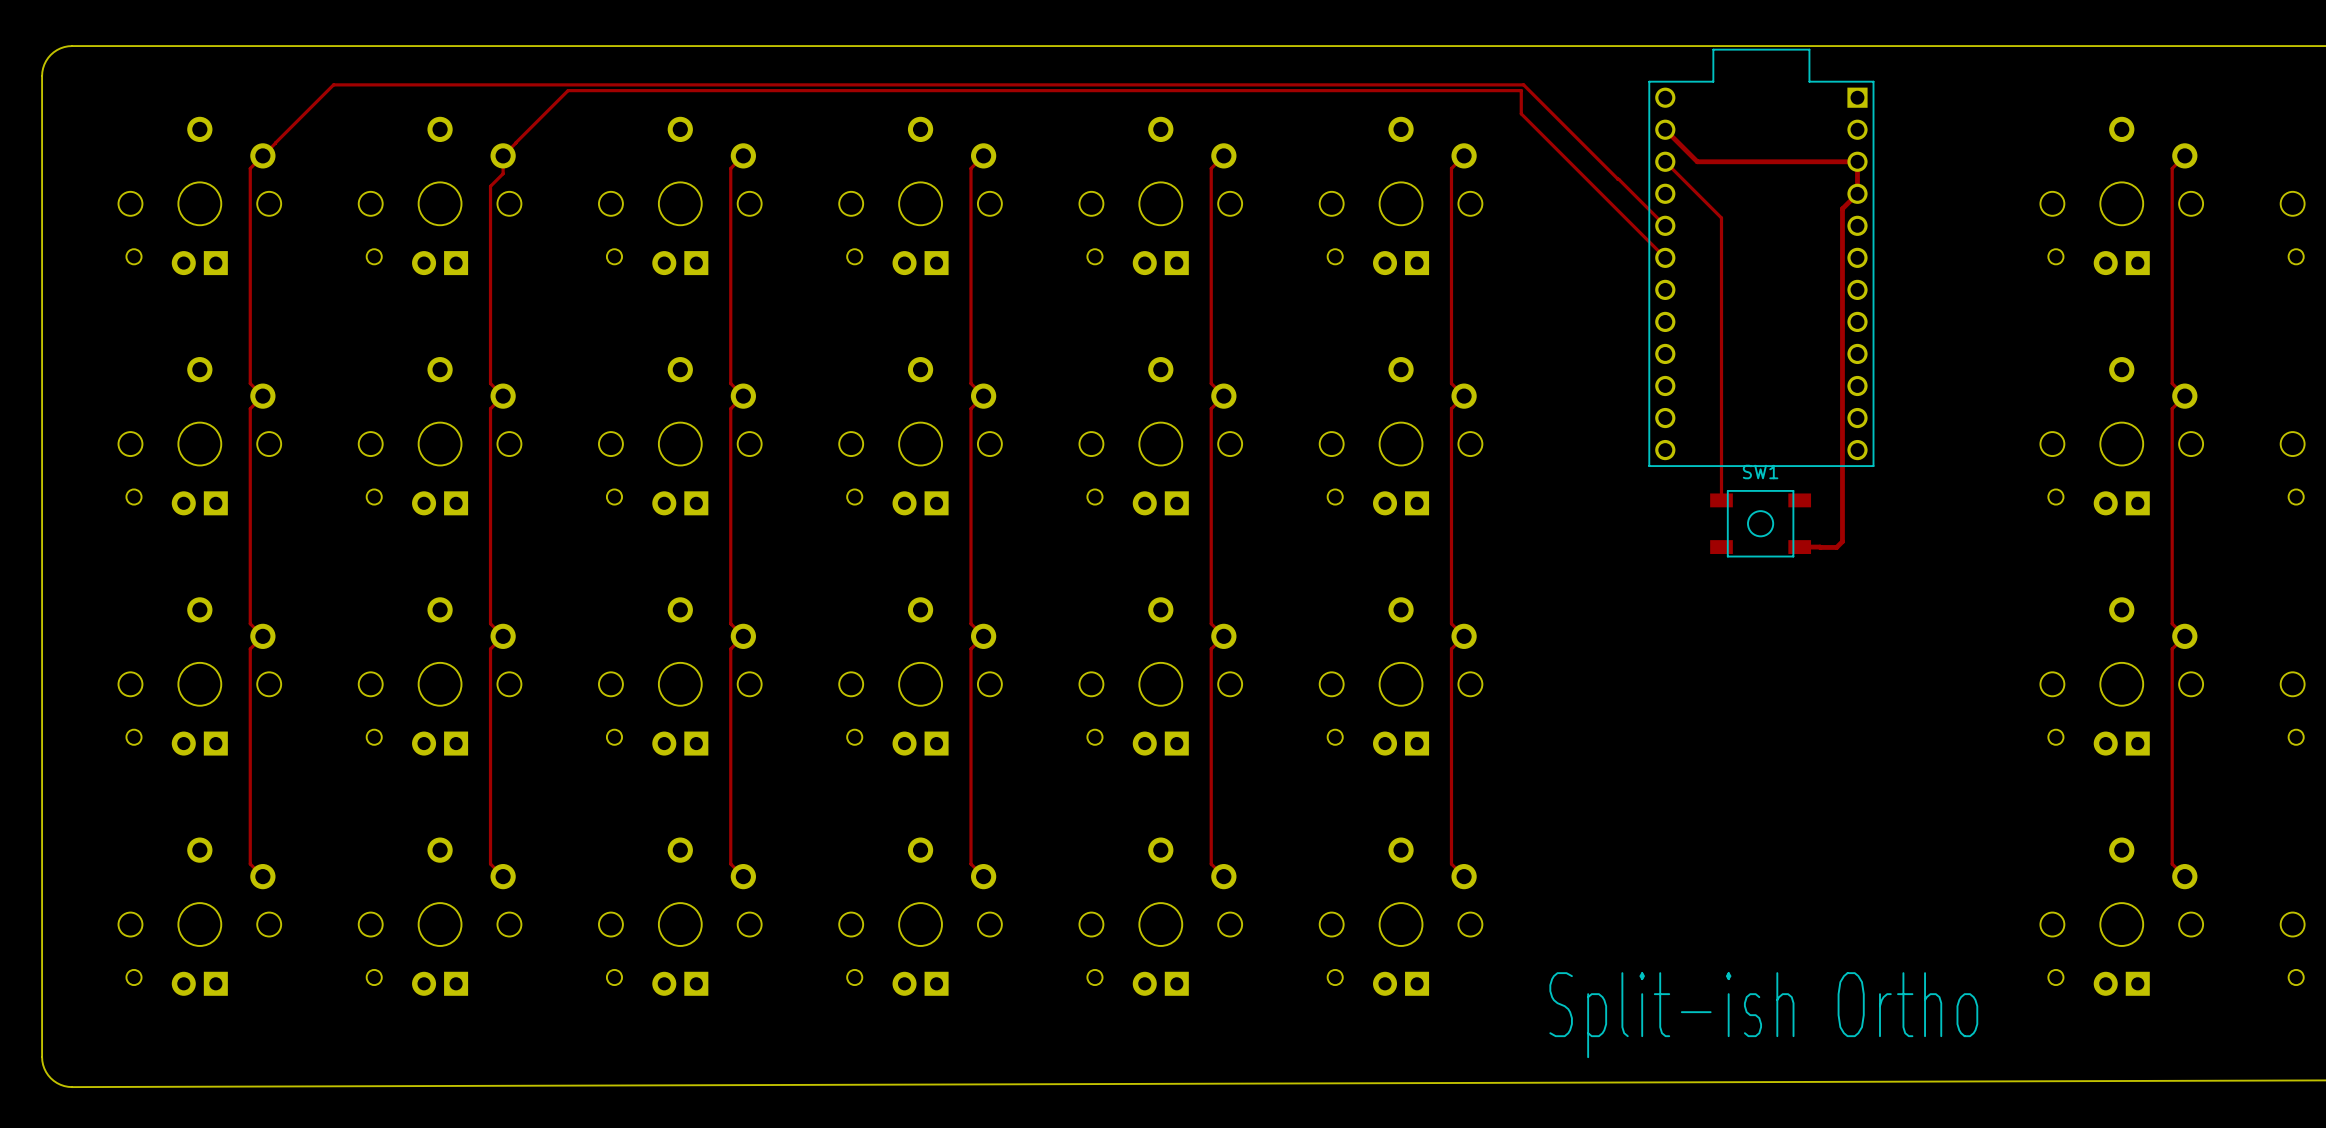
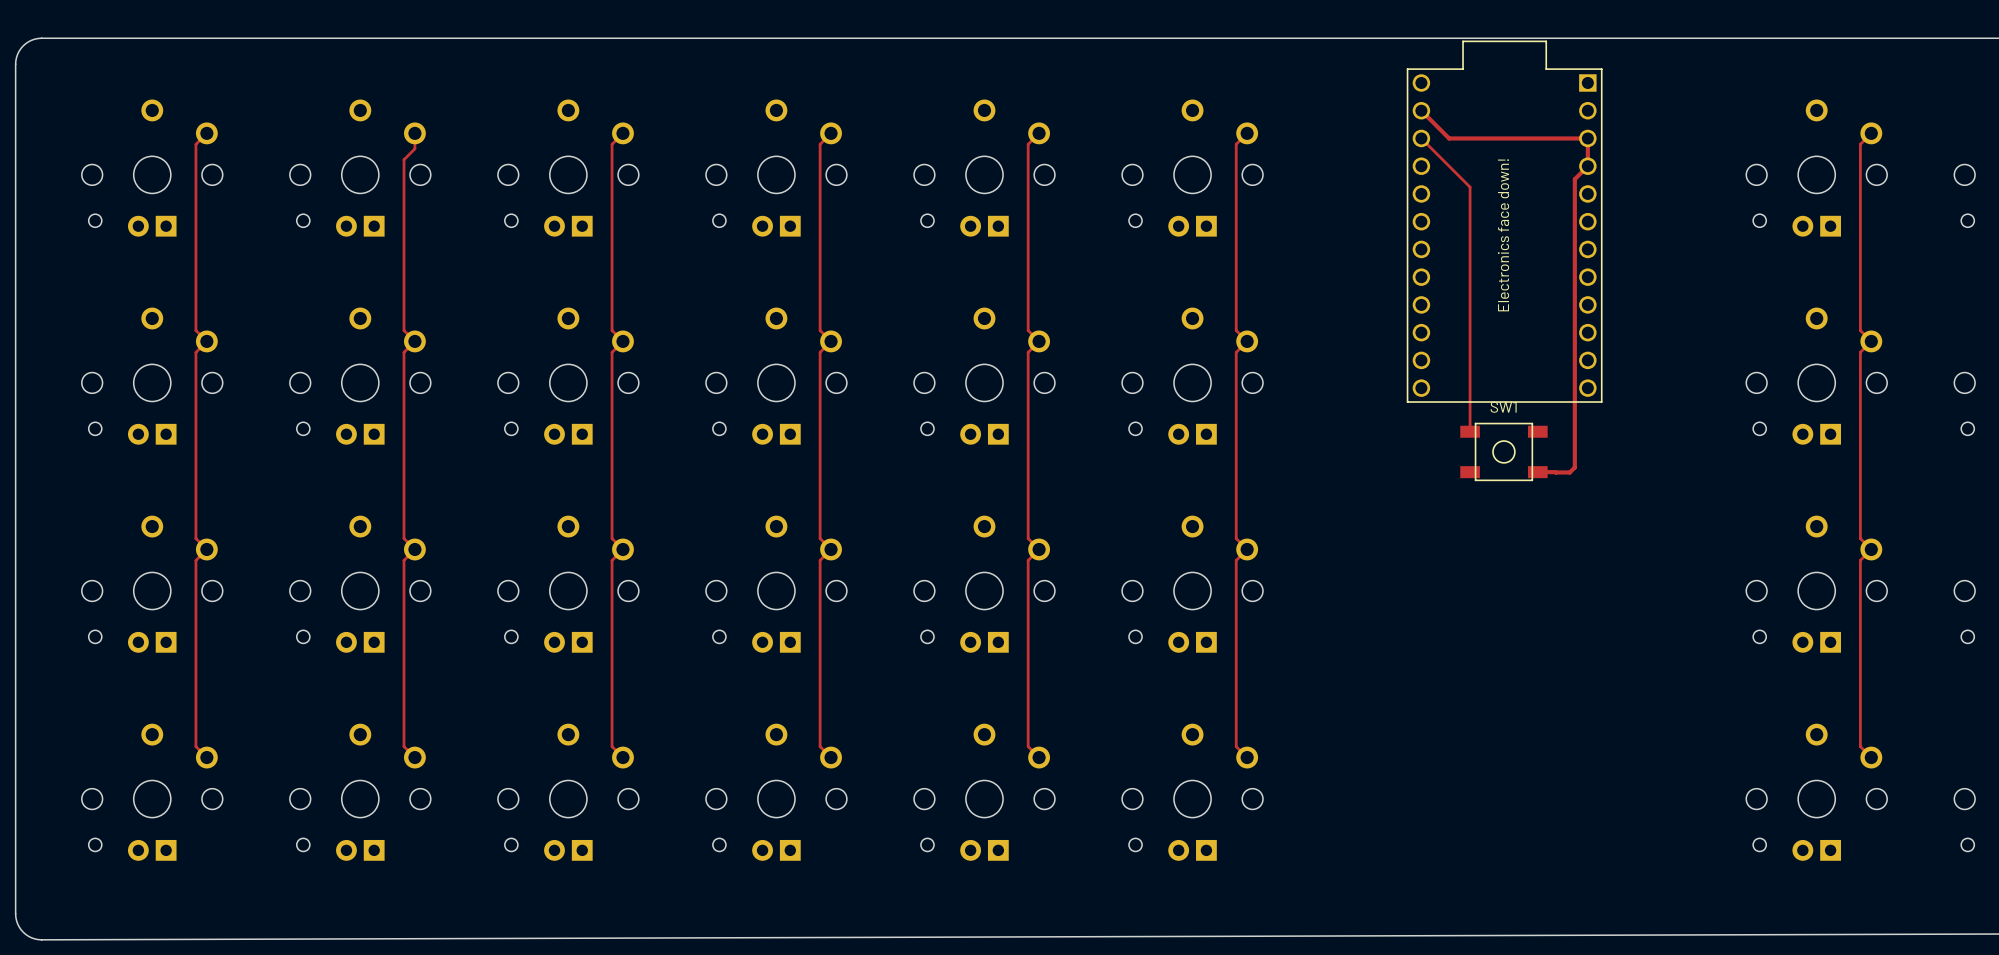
track: (262, 155) (333, 84) (1523, 84) (1665, 225) -> none
track: (503, 155) (568, 90) (1521, 90) (1521, 113) (1665, 257) -> none
text: none -> Electronics face down! (1503, 235)
text: Split-ish Ortho (1763, 1015) -> none

